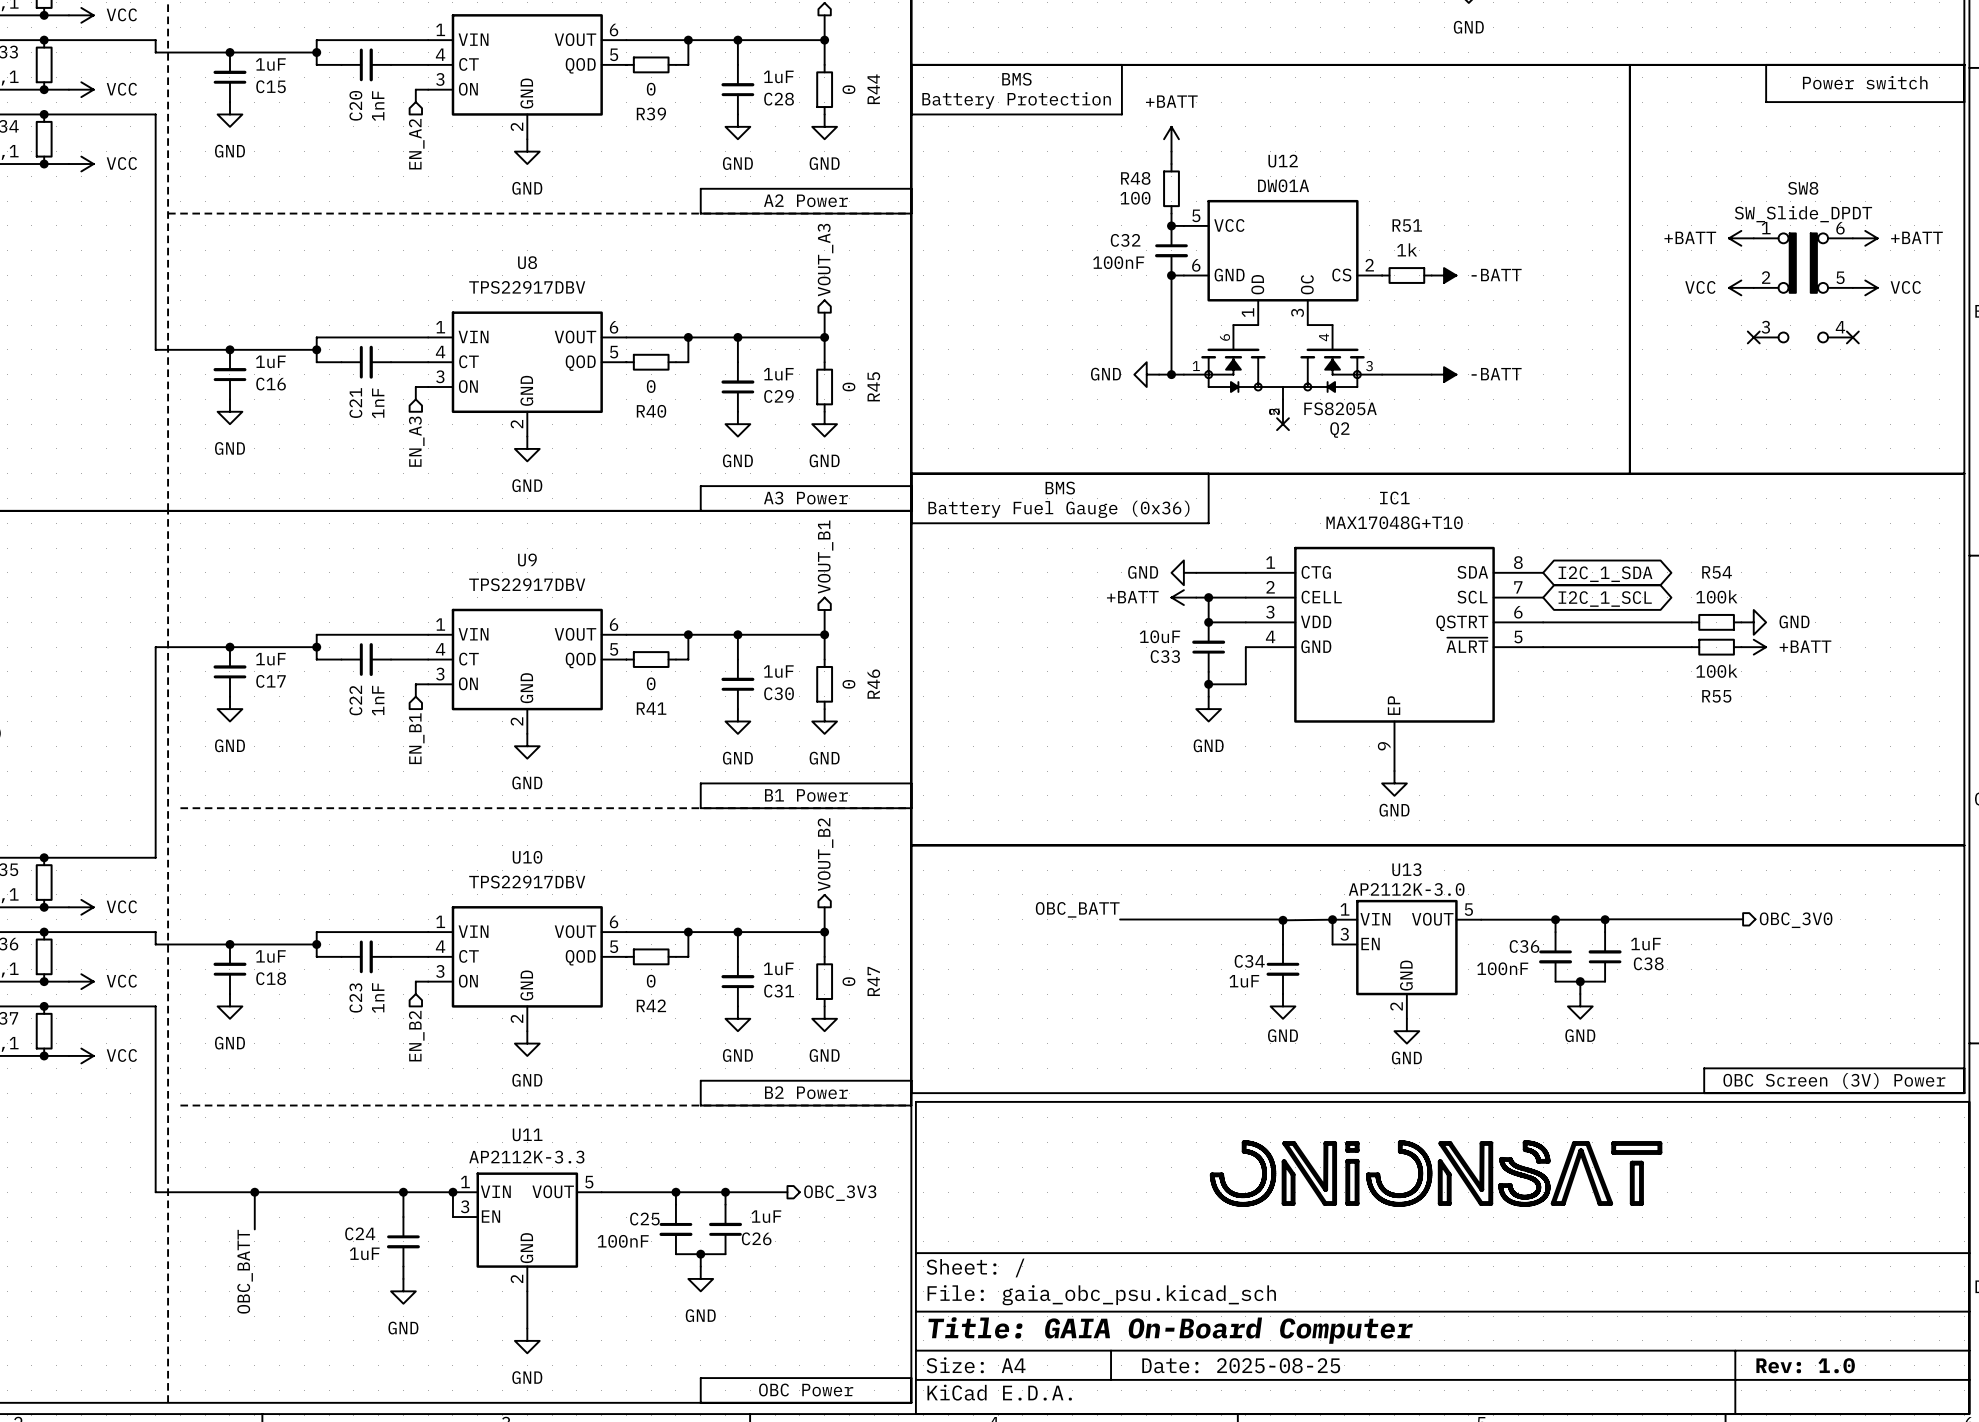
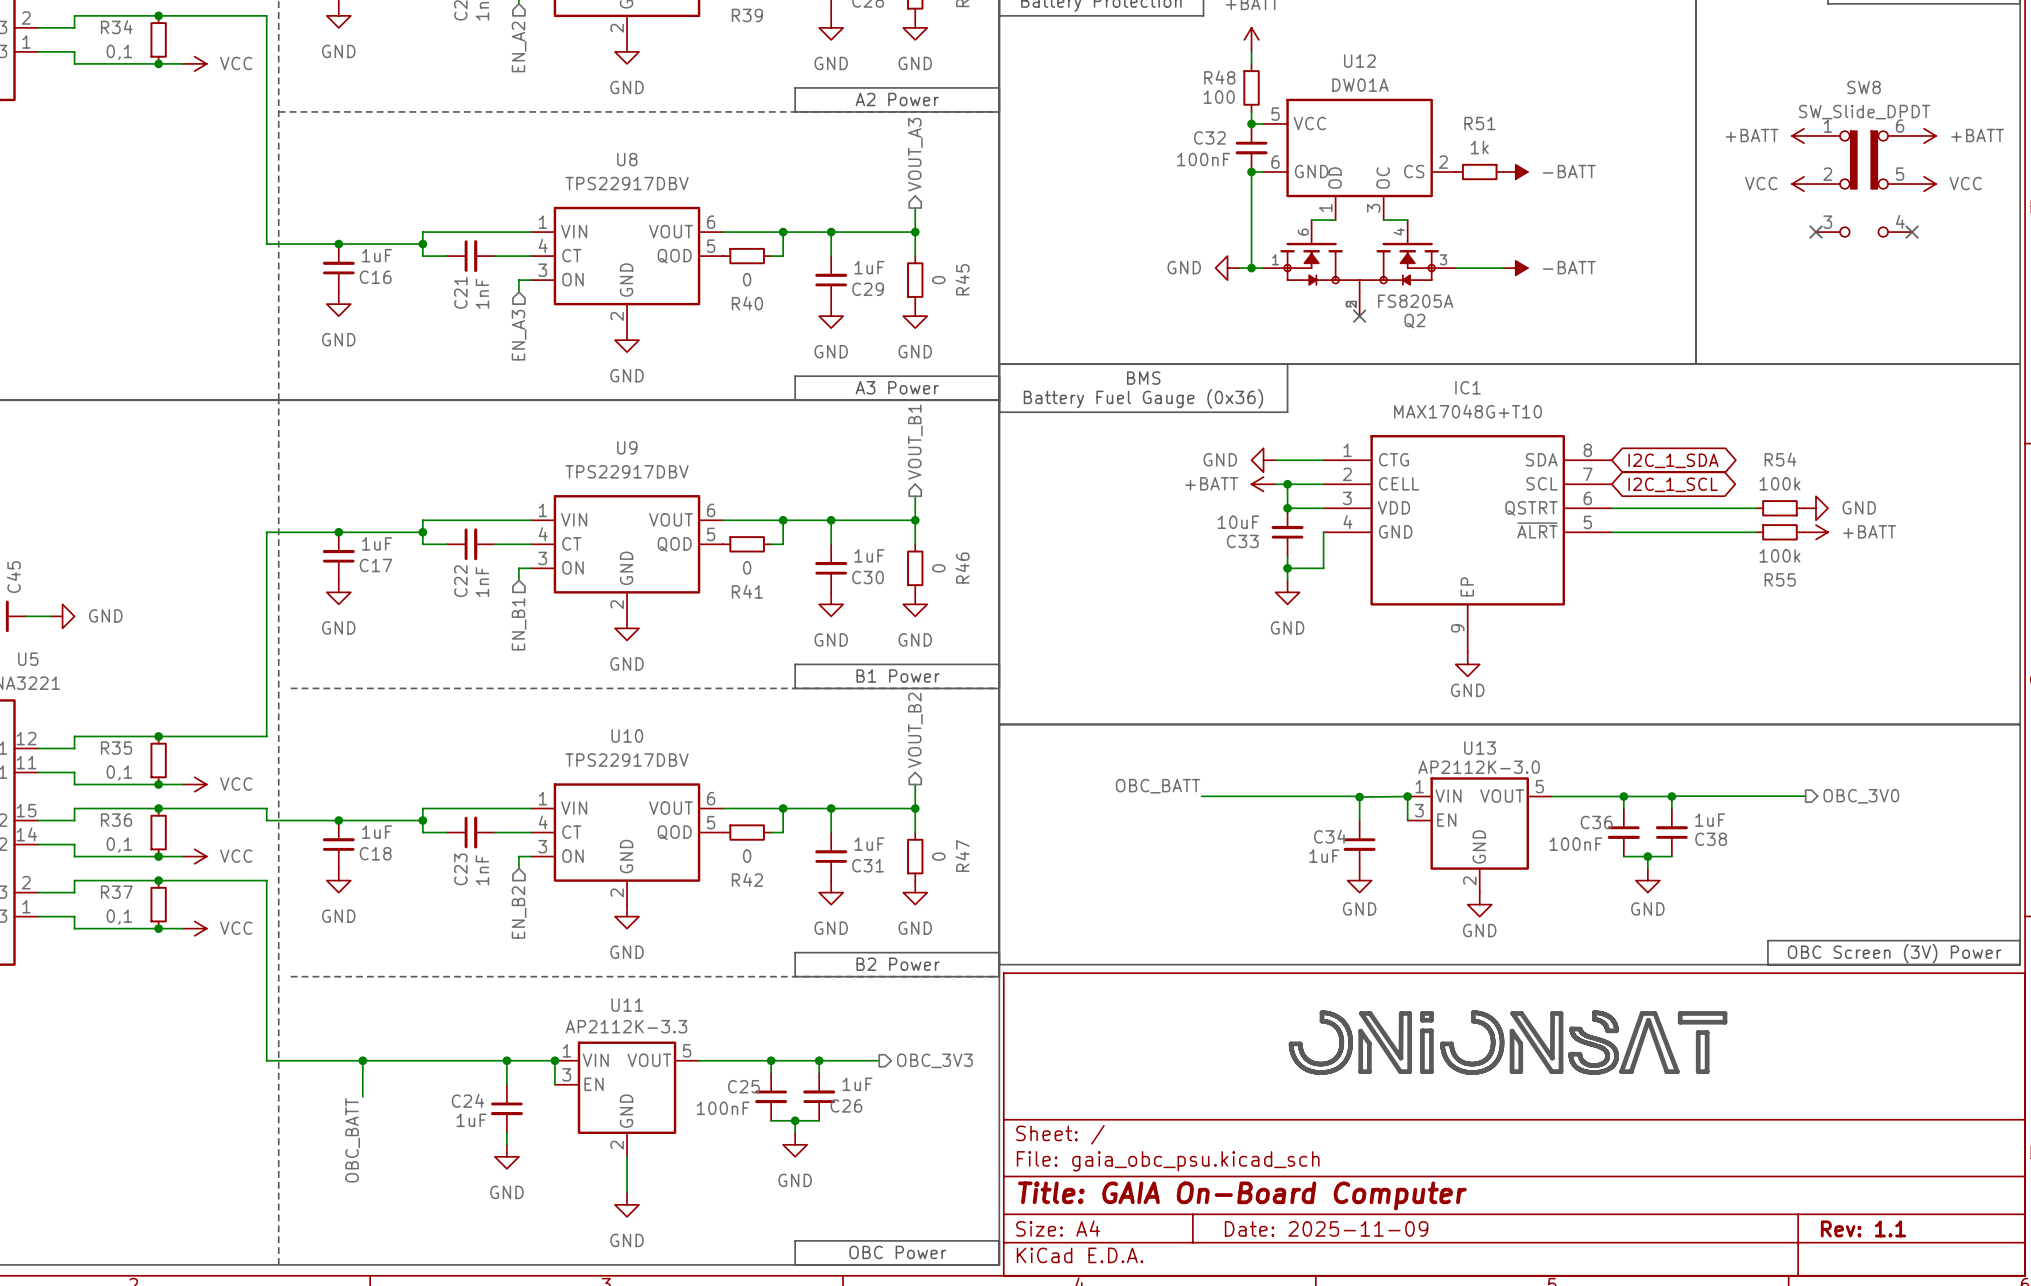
title block: Date: 2025-08-25 (1241, 1365) -> Date: 2025-11-09 (1326, 1228)
title block: Rev: 1.0 (1805, 1365) -> Rev: 1.1 (1863, 1228)

